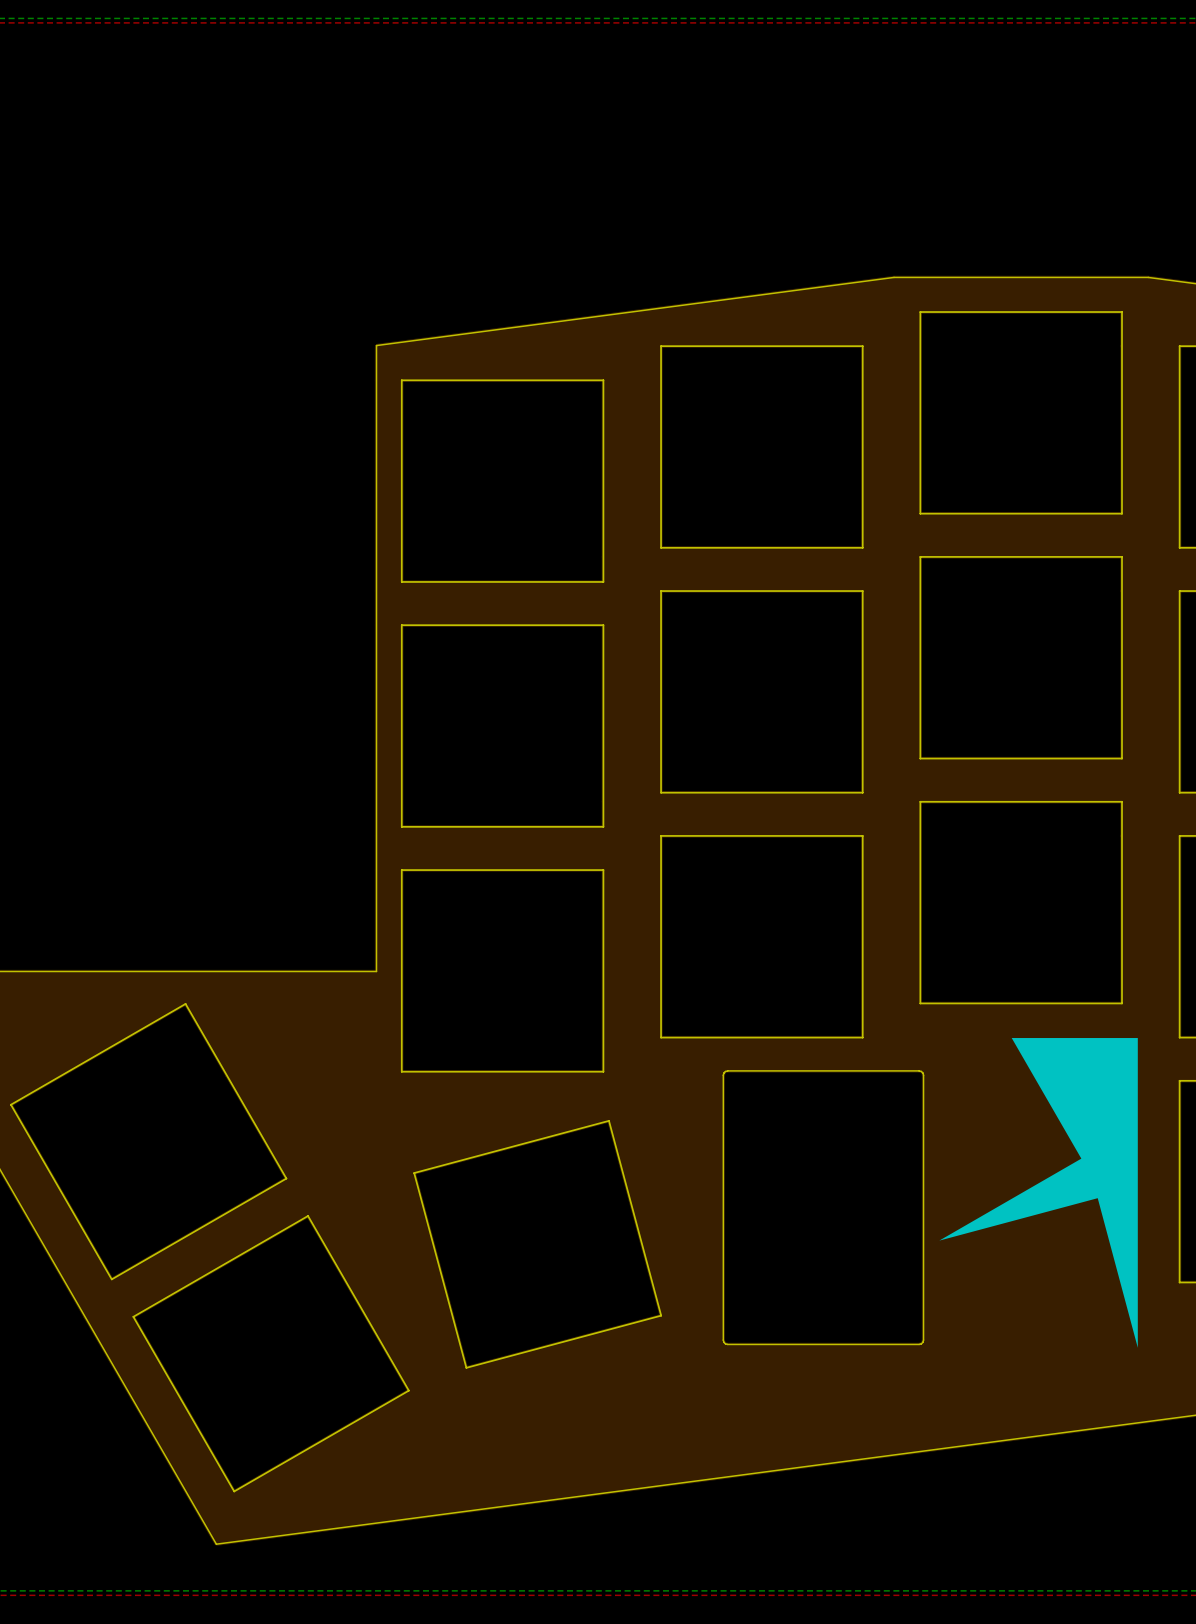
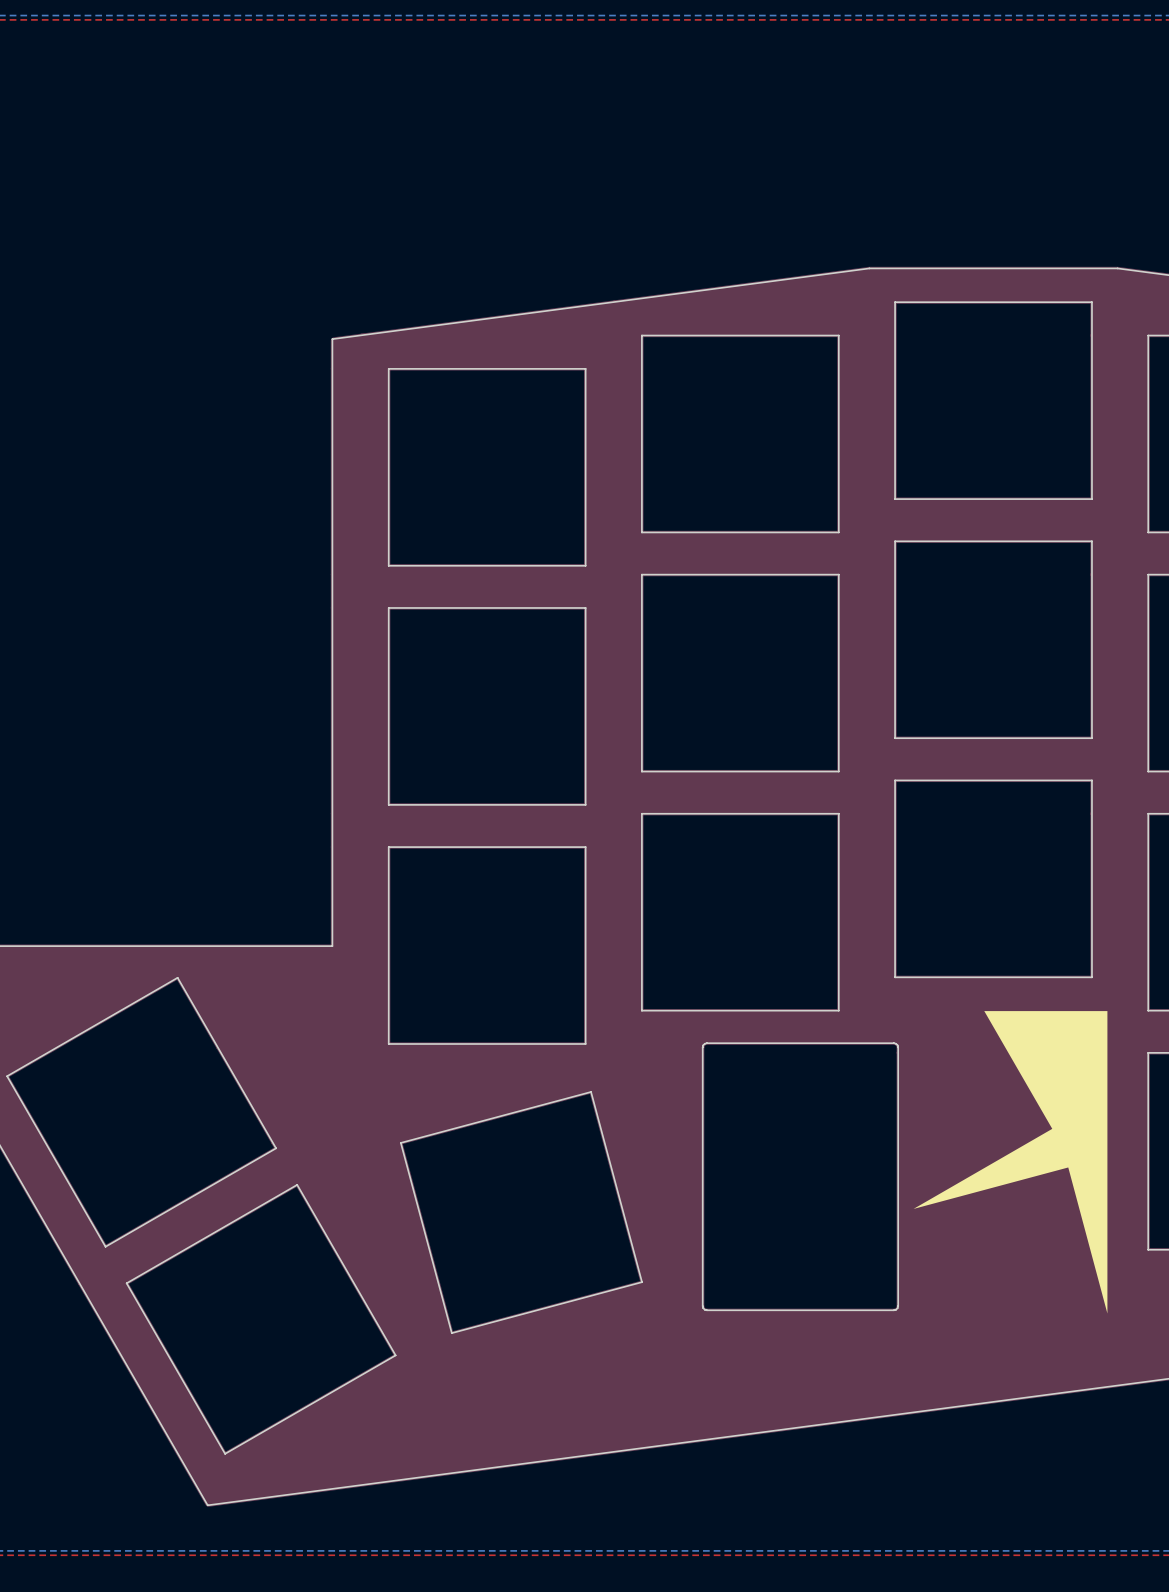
board edge: (376, 345) (376, 971) (344, 971) -> (364, 334) (332, 339) (332, 946)

